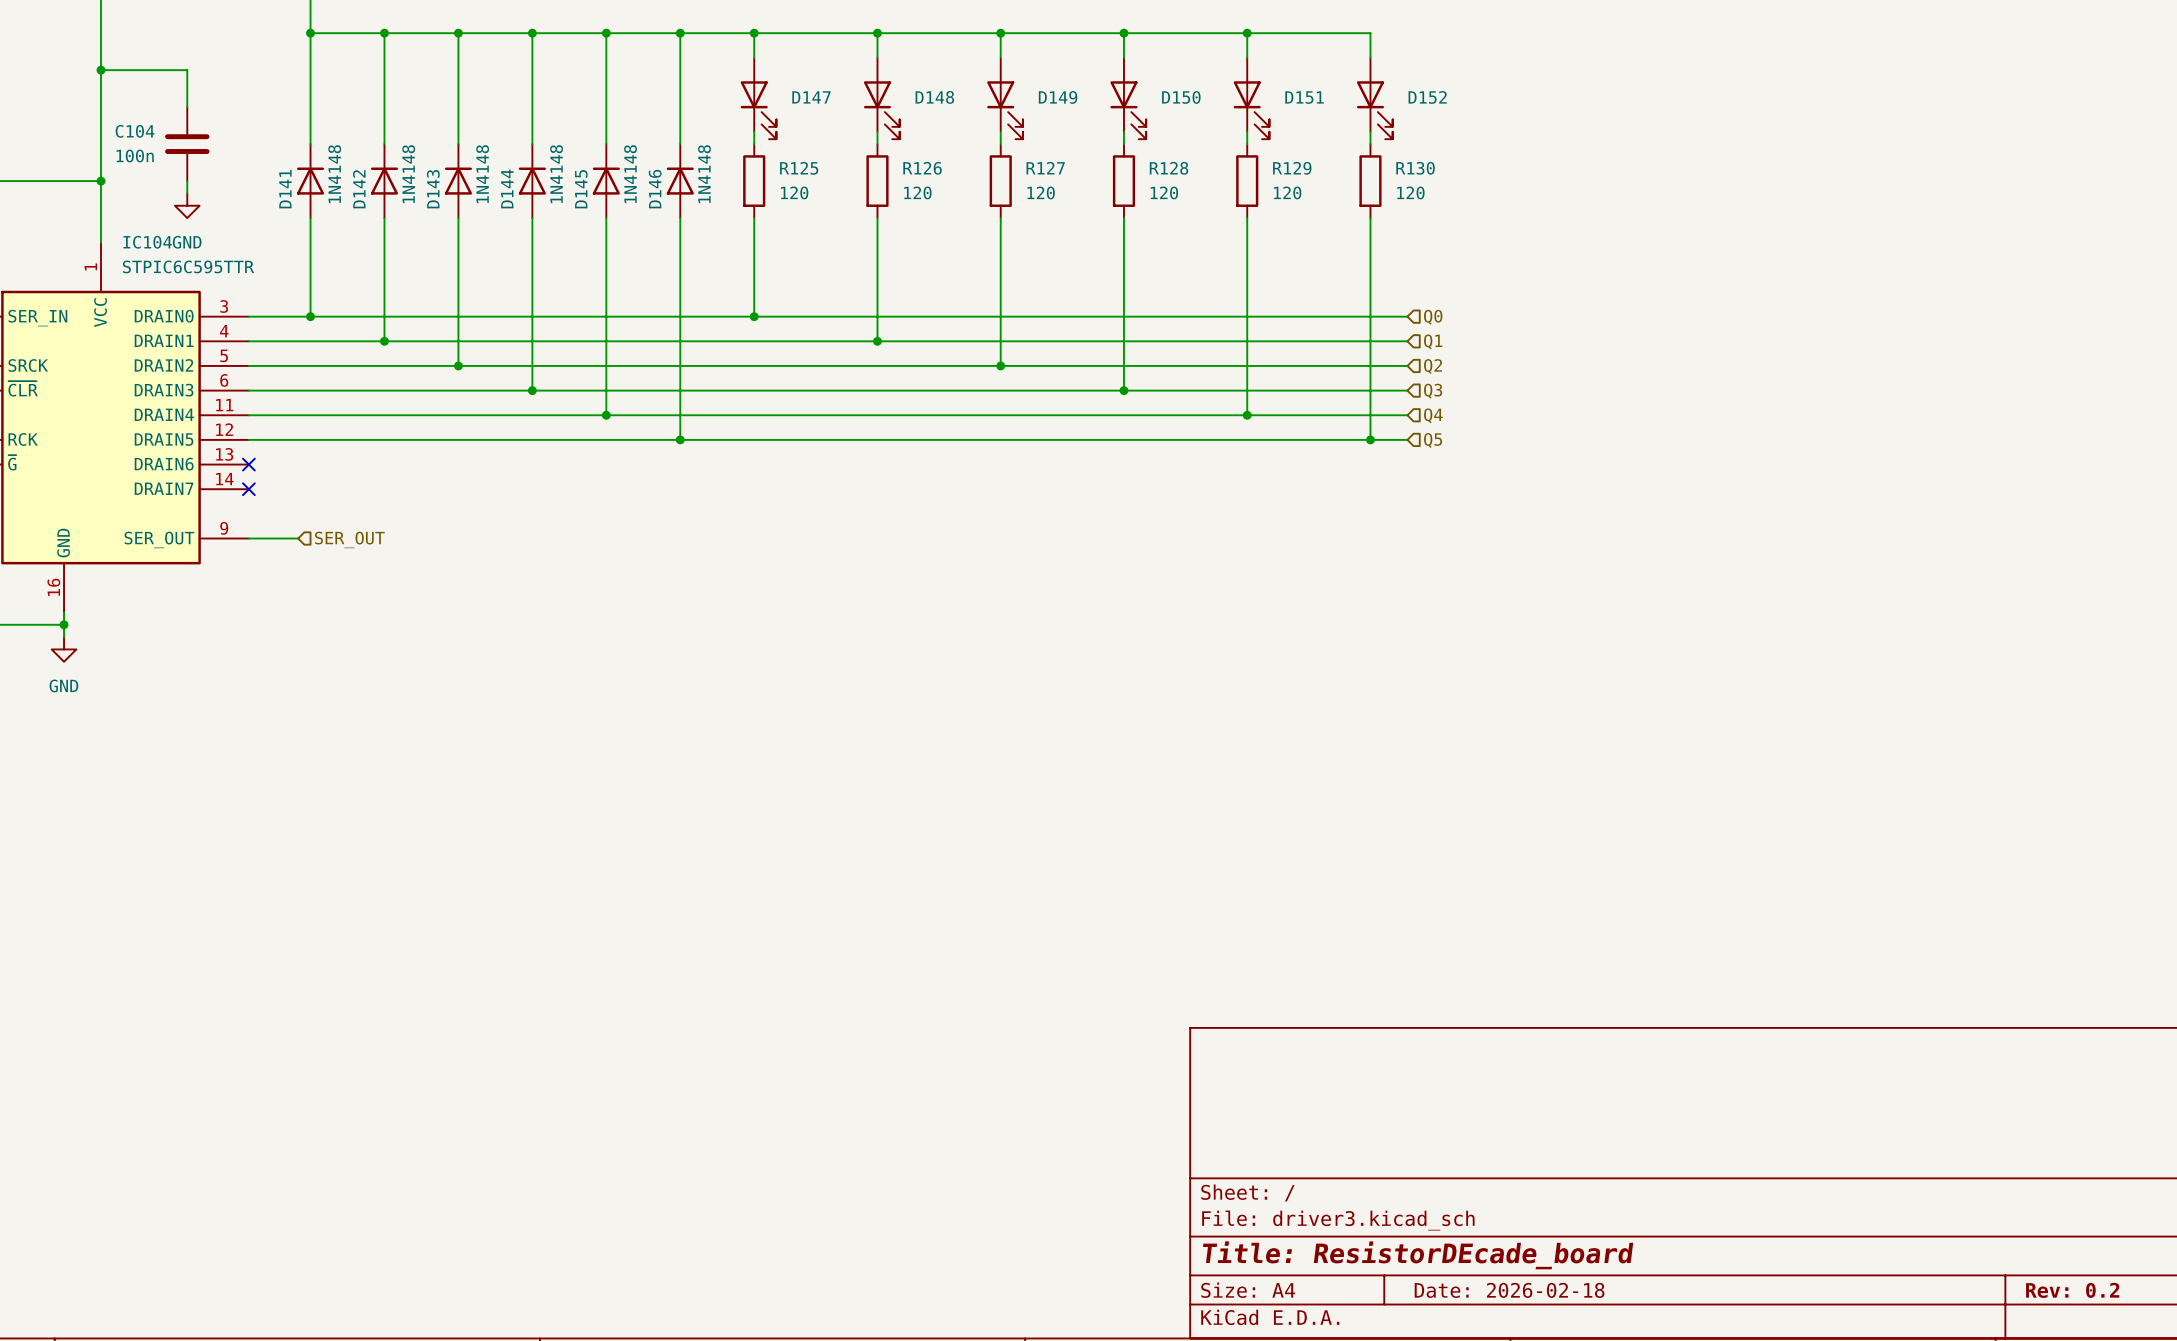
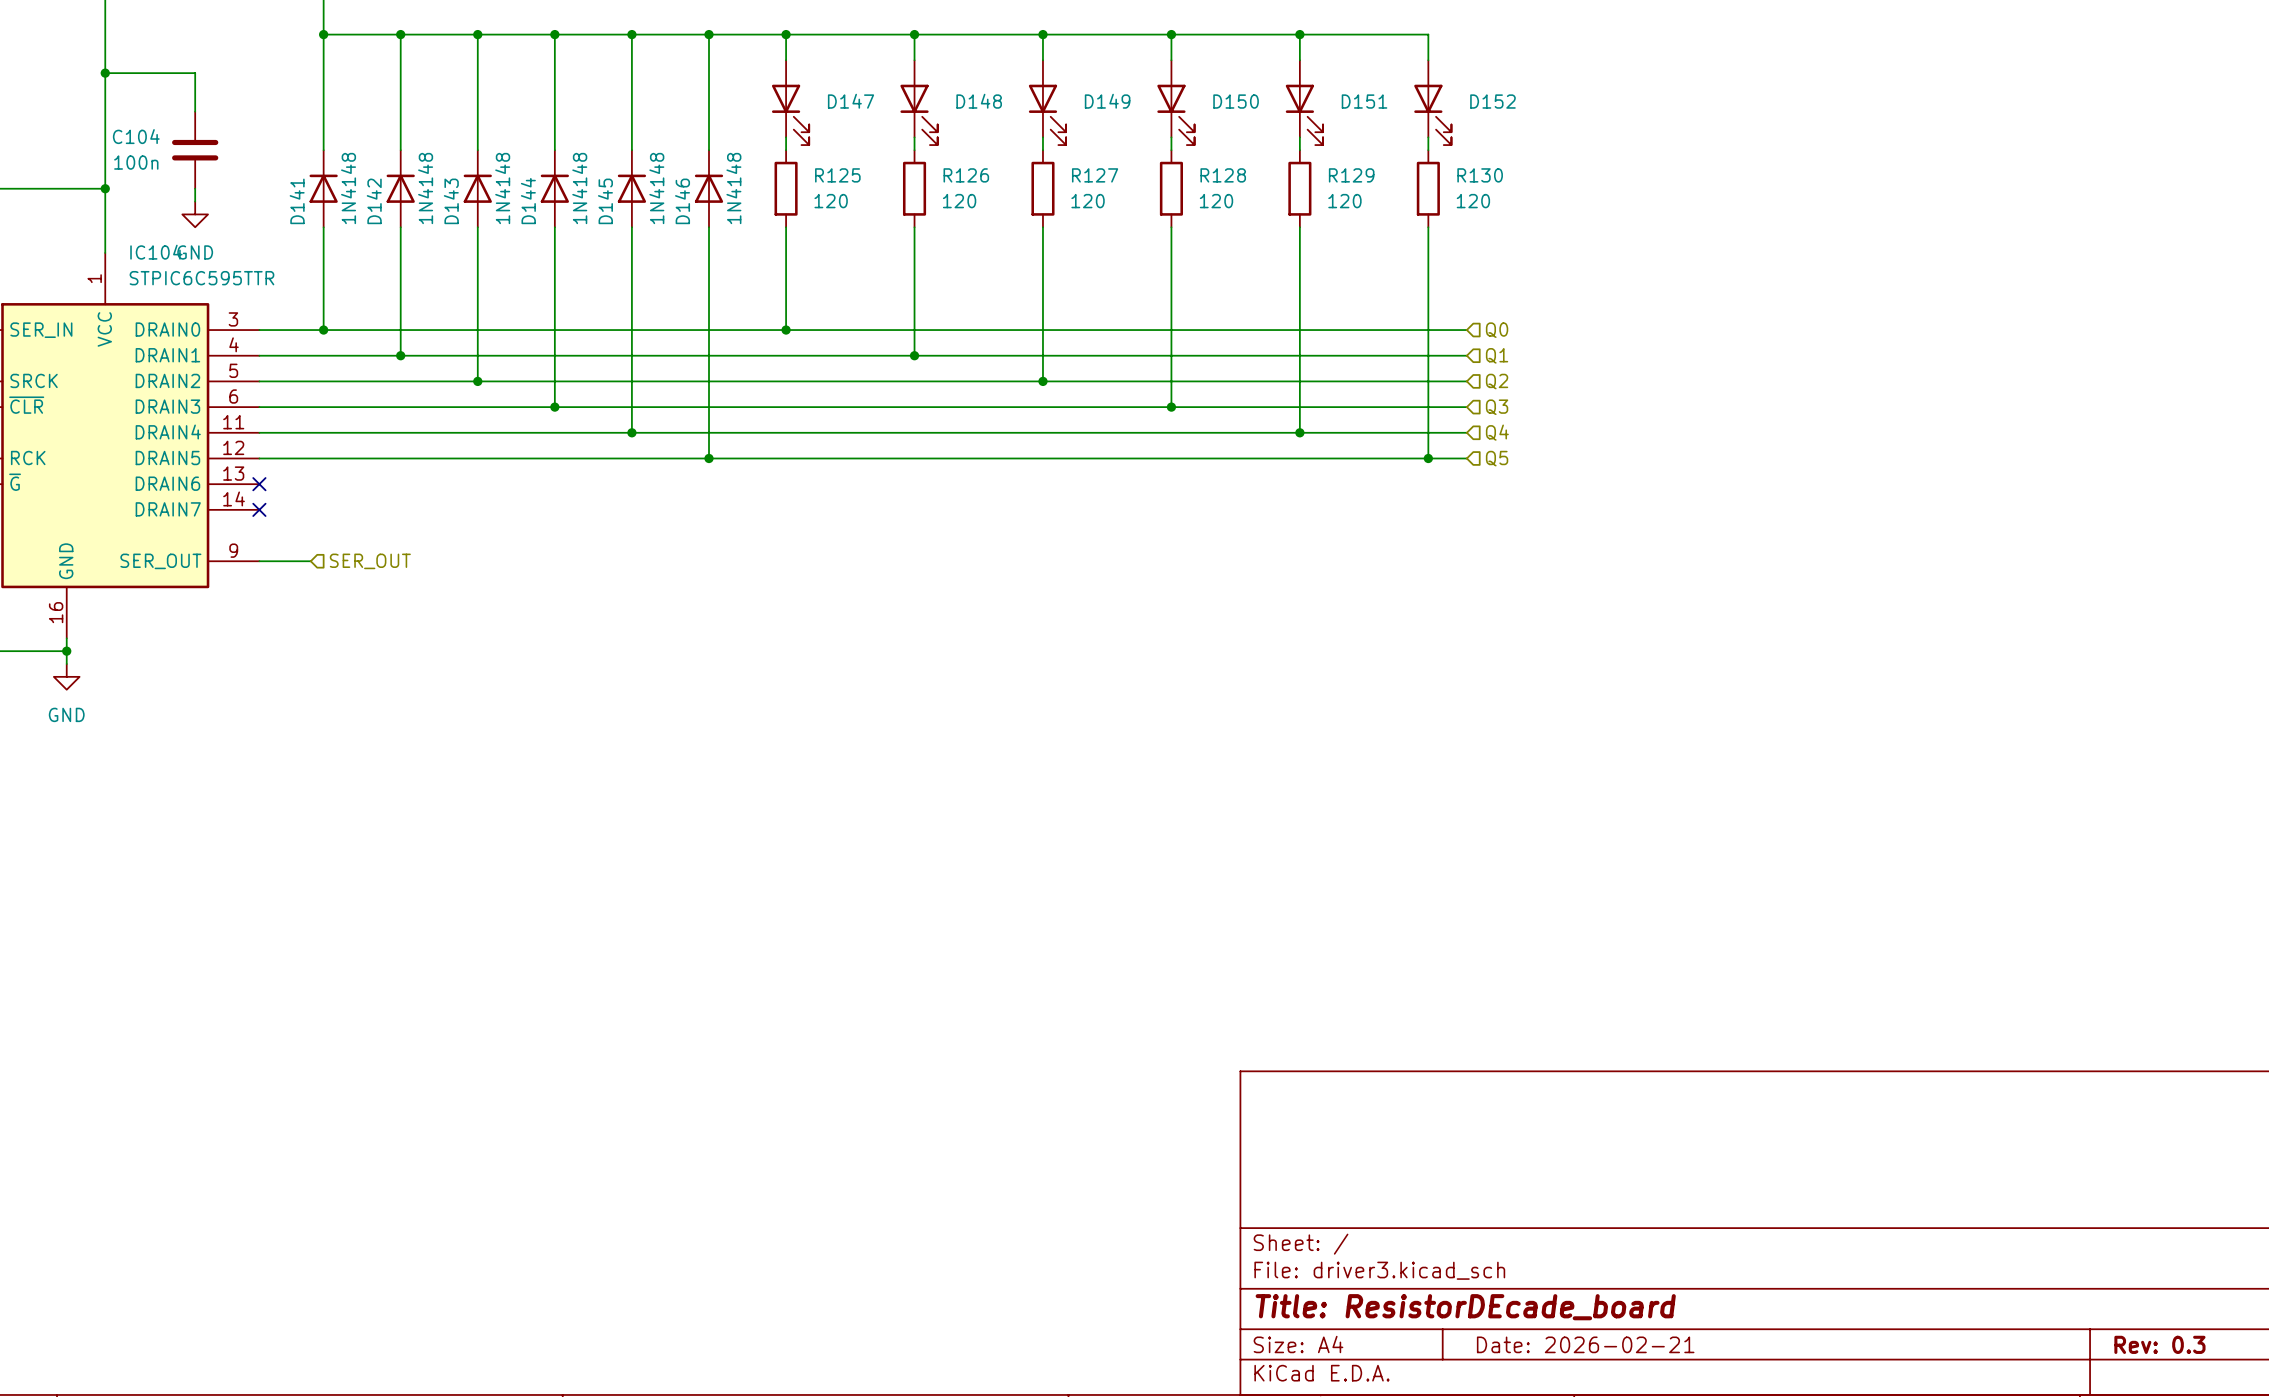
title block: Date: 2026-02-18 (1509, 1290) -> Date: 2026-02-21 (1585, 1344)
title block: Rev: 0.2 (2072, 1290) -> Rev: 0.3 (2159, 1344)

